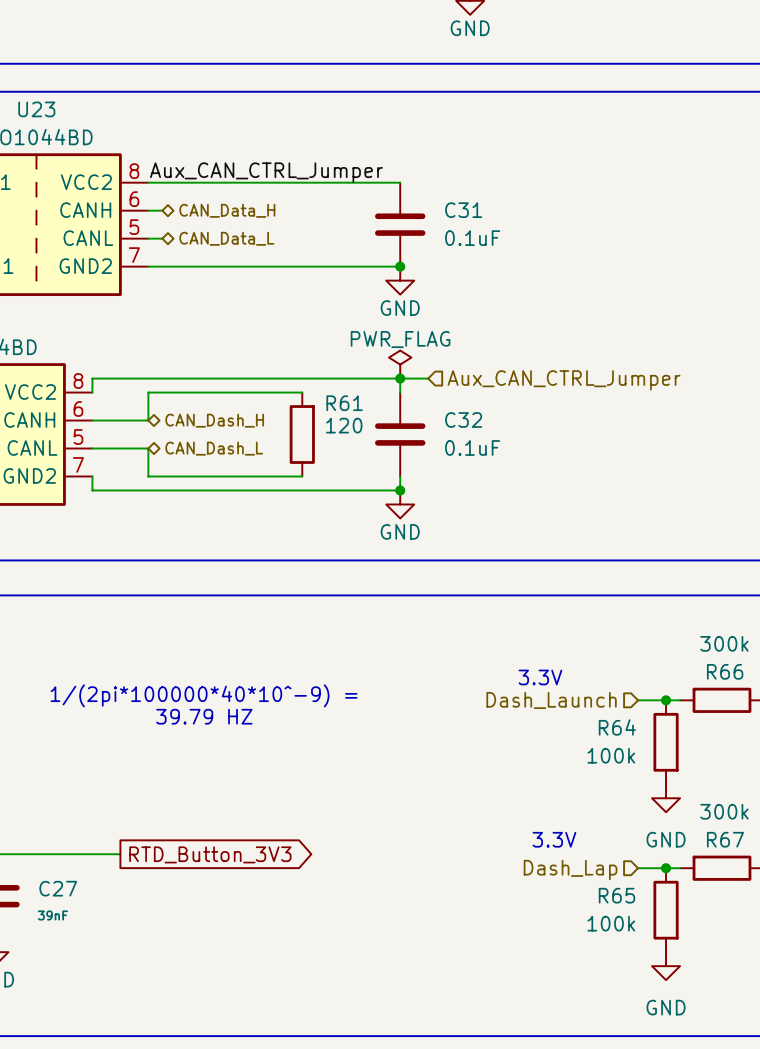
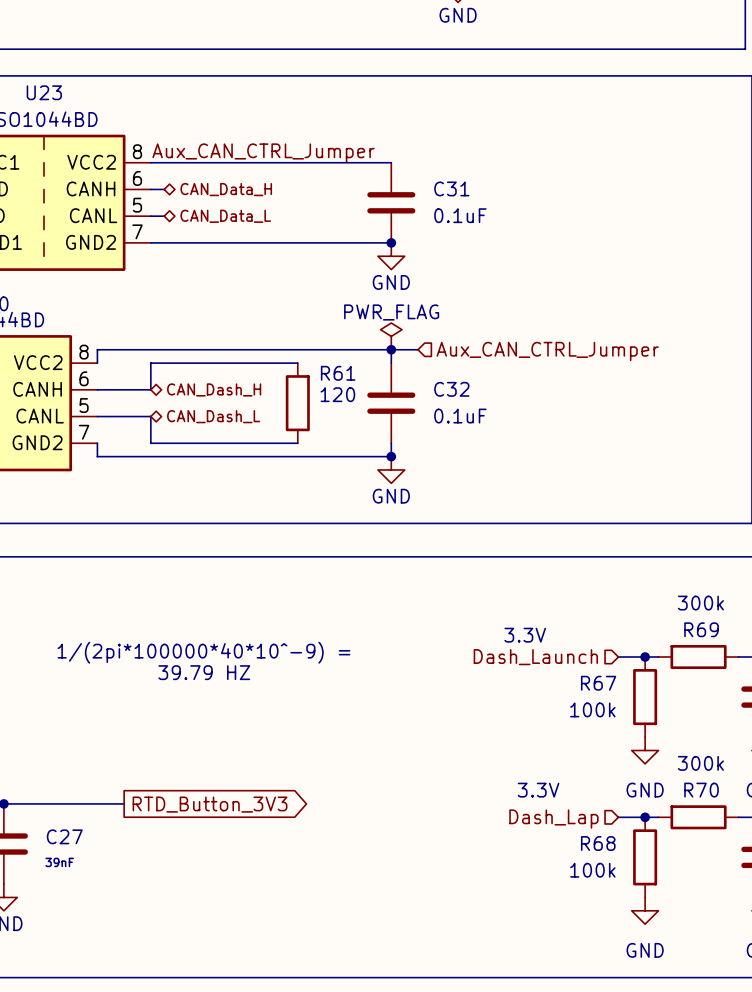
R66 name: R66 (725, 671) -> R69 (701, 629)
R64 name: R64 (617, 727) -> R67 (598, 683)
R67 name: R67 (725, 839) -> R70 (701, 790)
R65 name: R65 (616, 895) -> R68 (598, 843)

